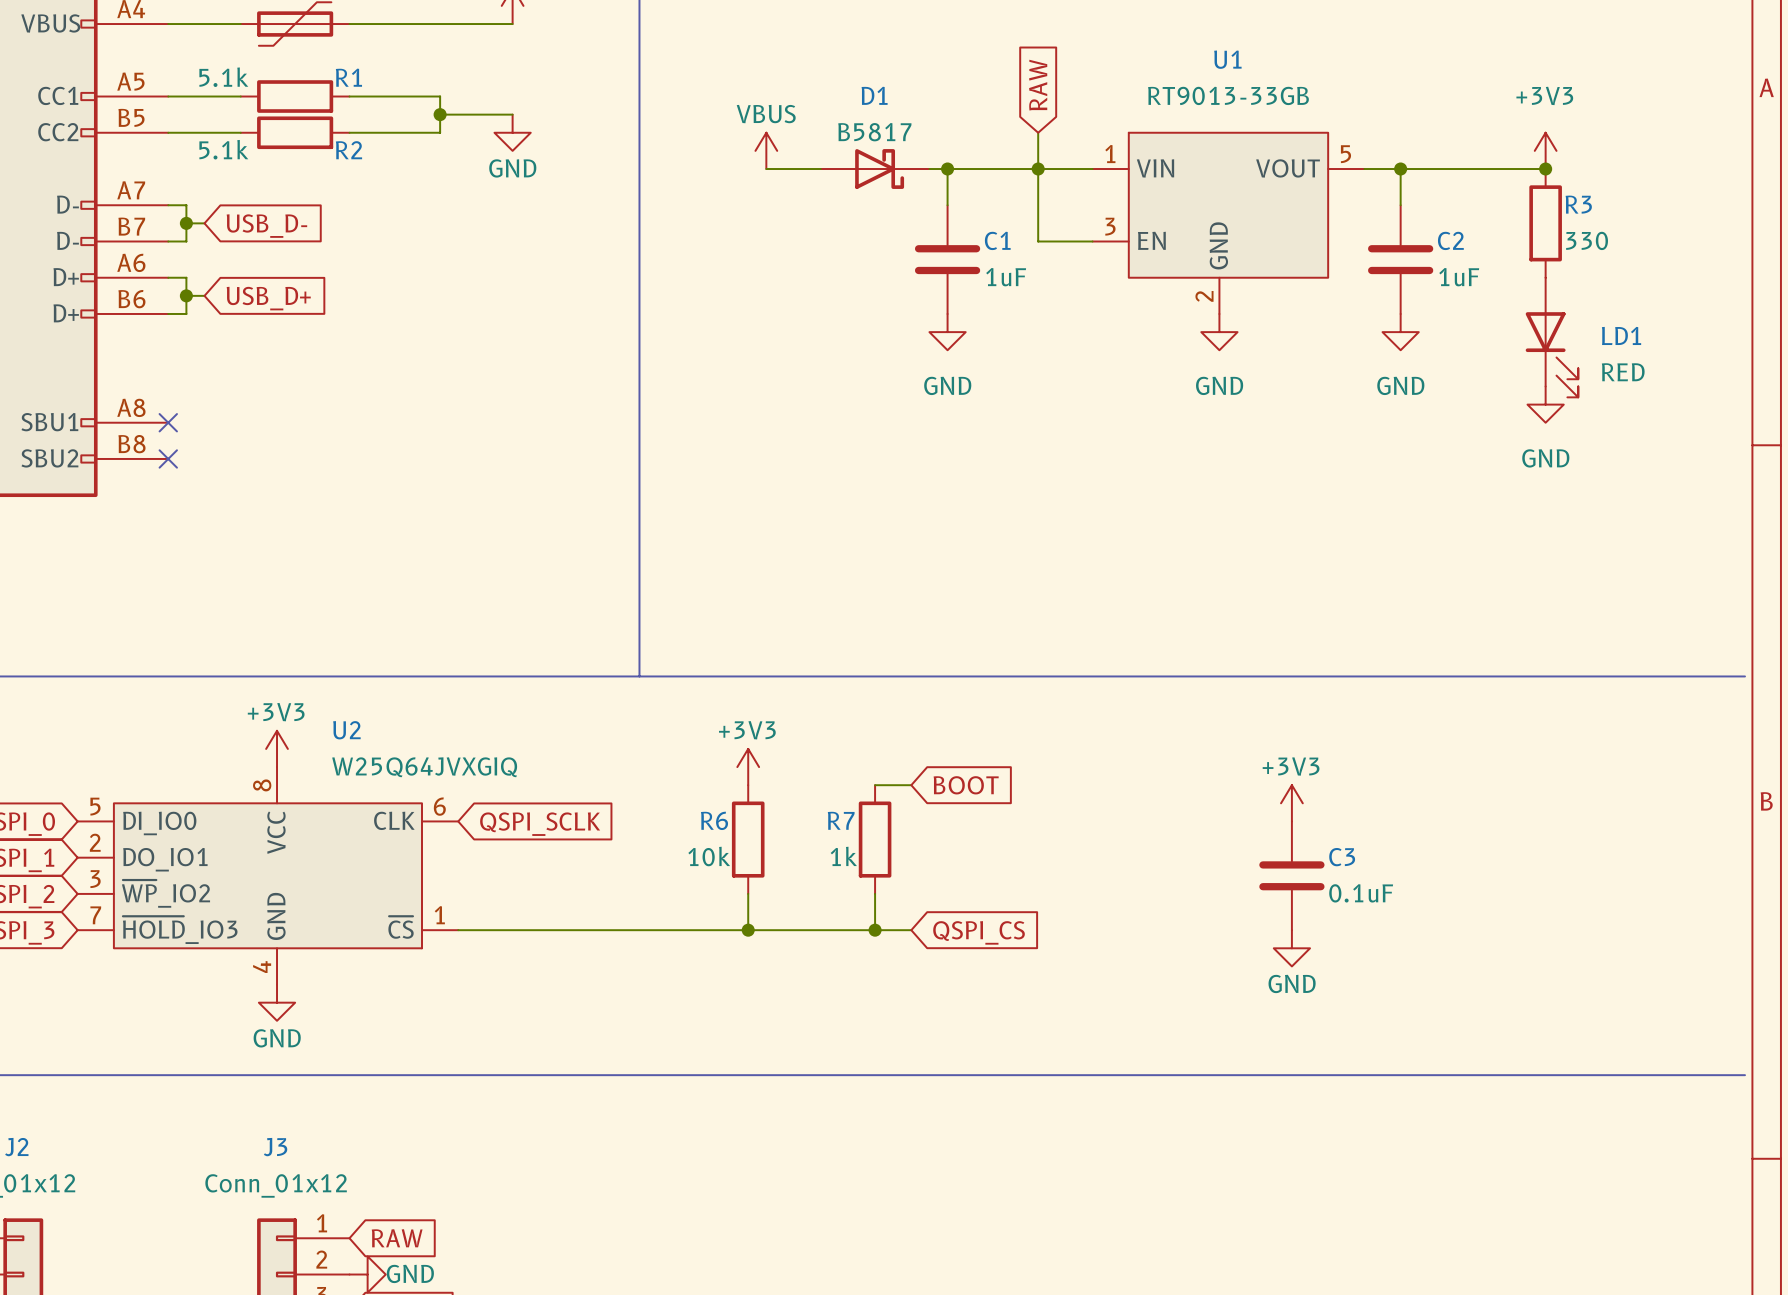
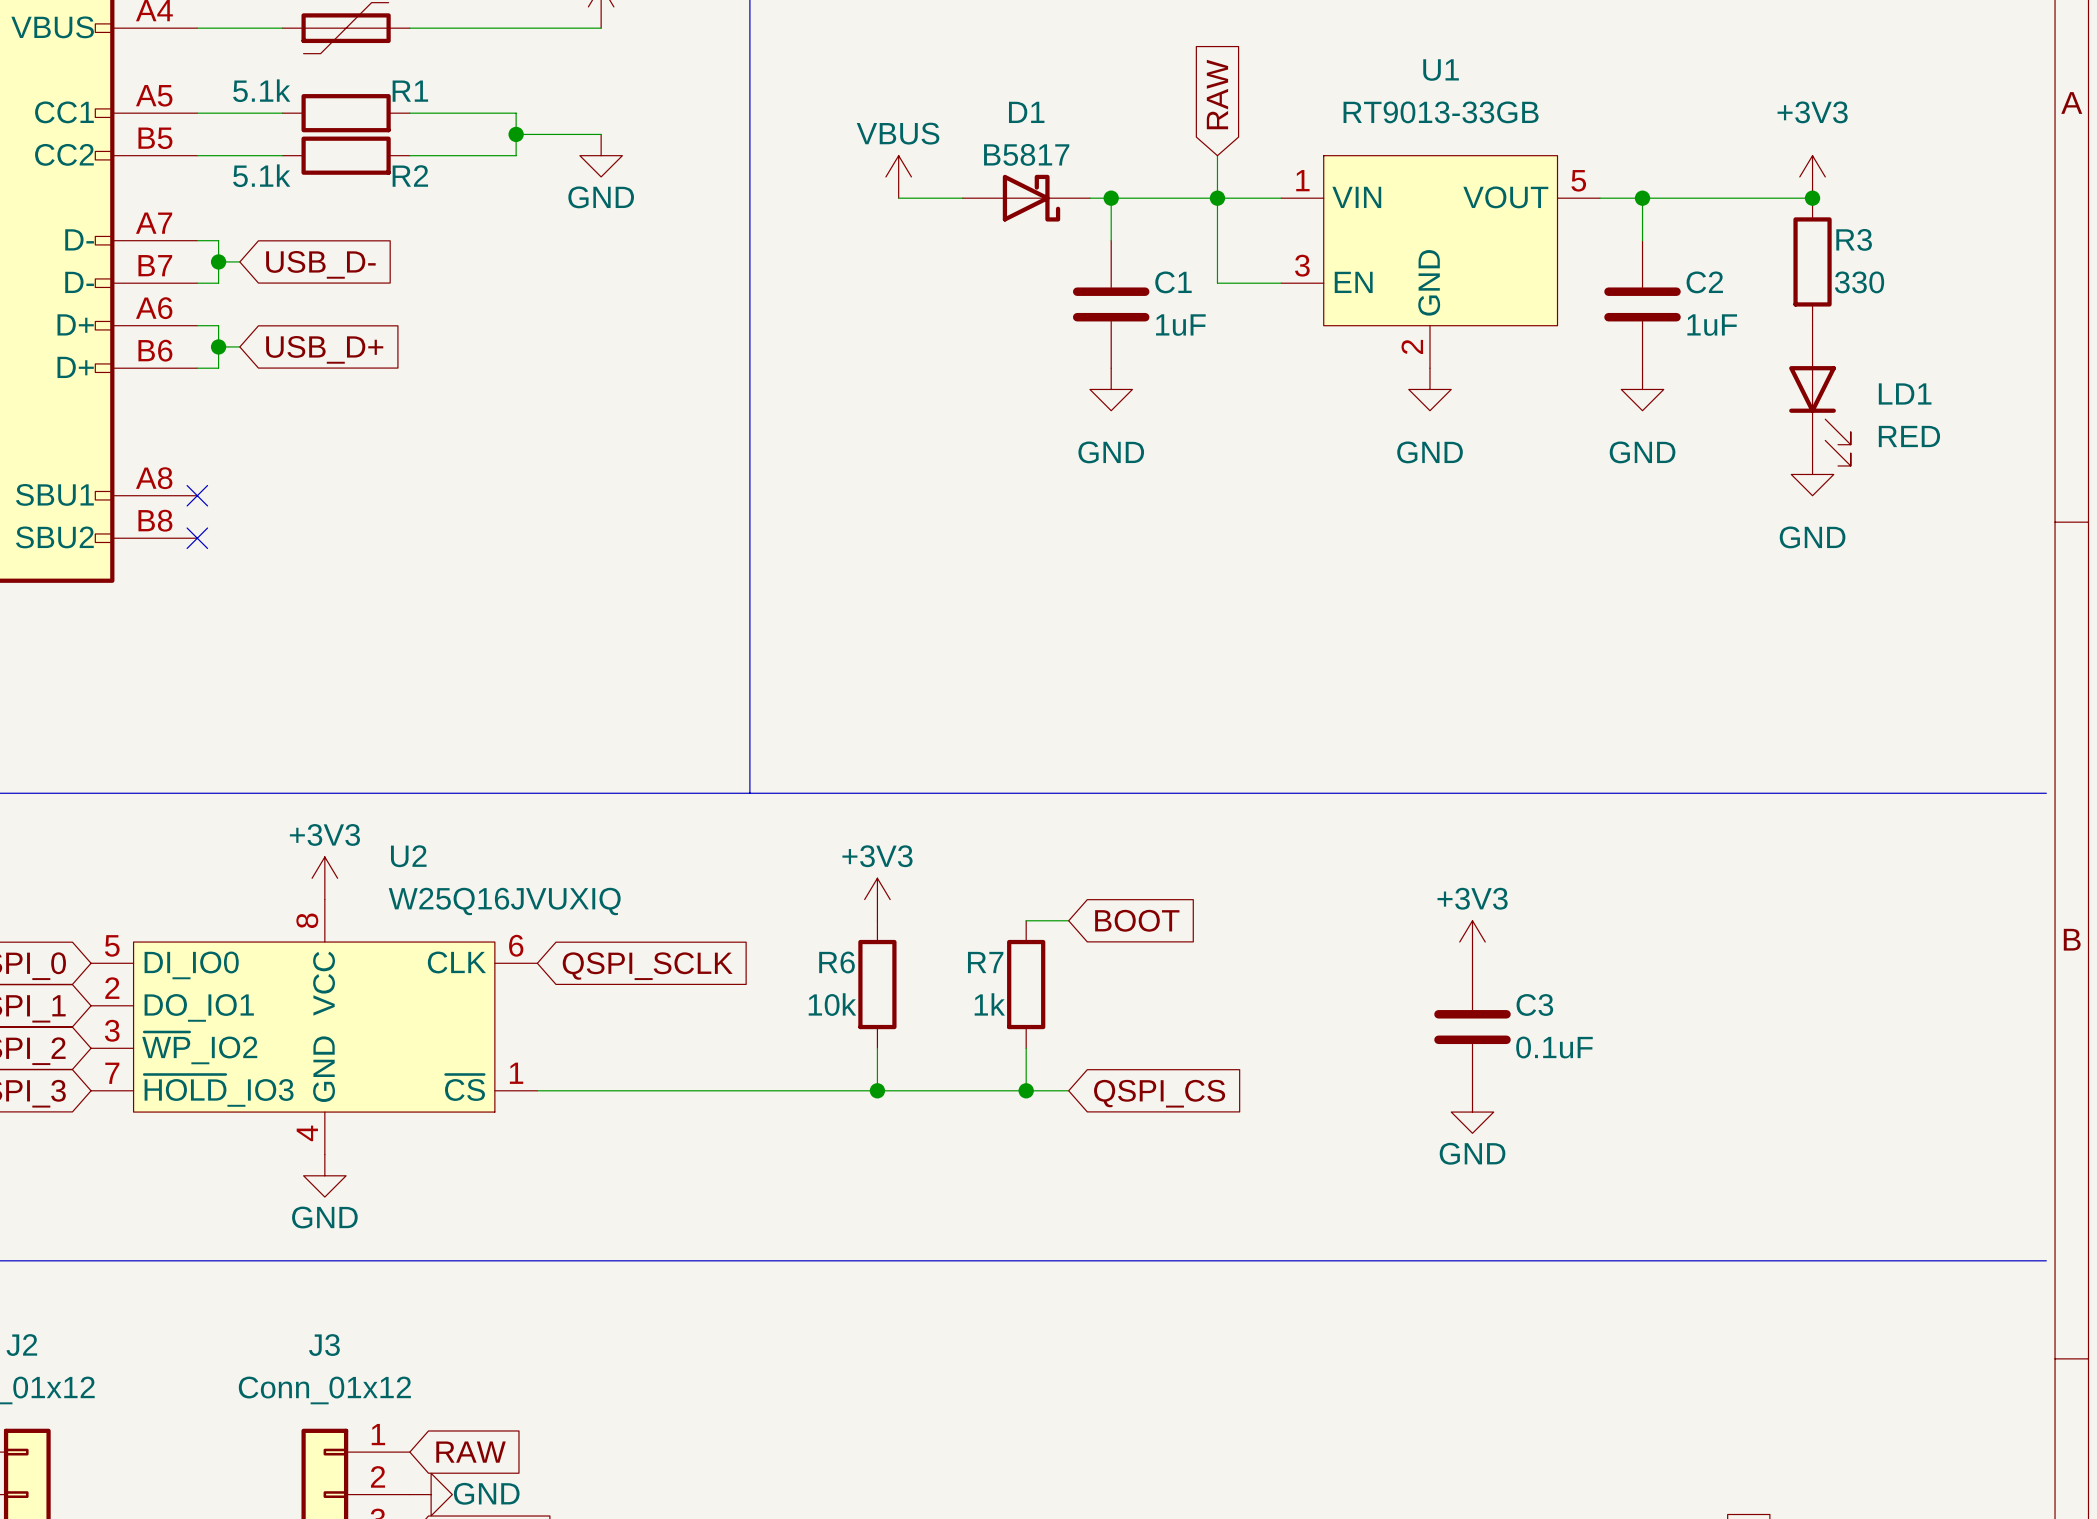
U2 value: W25Q64JVXGIQ (424, 767) -> W25Q16JVUXIQ (504, 901)
power symbol position: +3V3 (1291, 803) -> +3V3 (1472, 942)
C3 position: (1291, 875) -> (1472, 1027)
power symbol position: GND (1291, 948) -> GND (1472, 1112)

